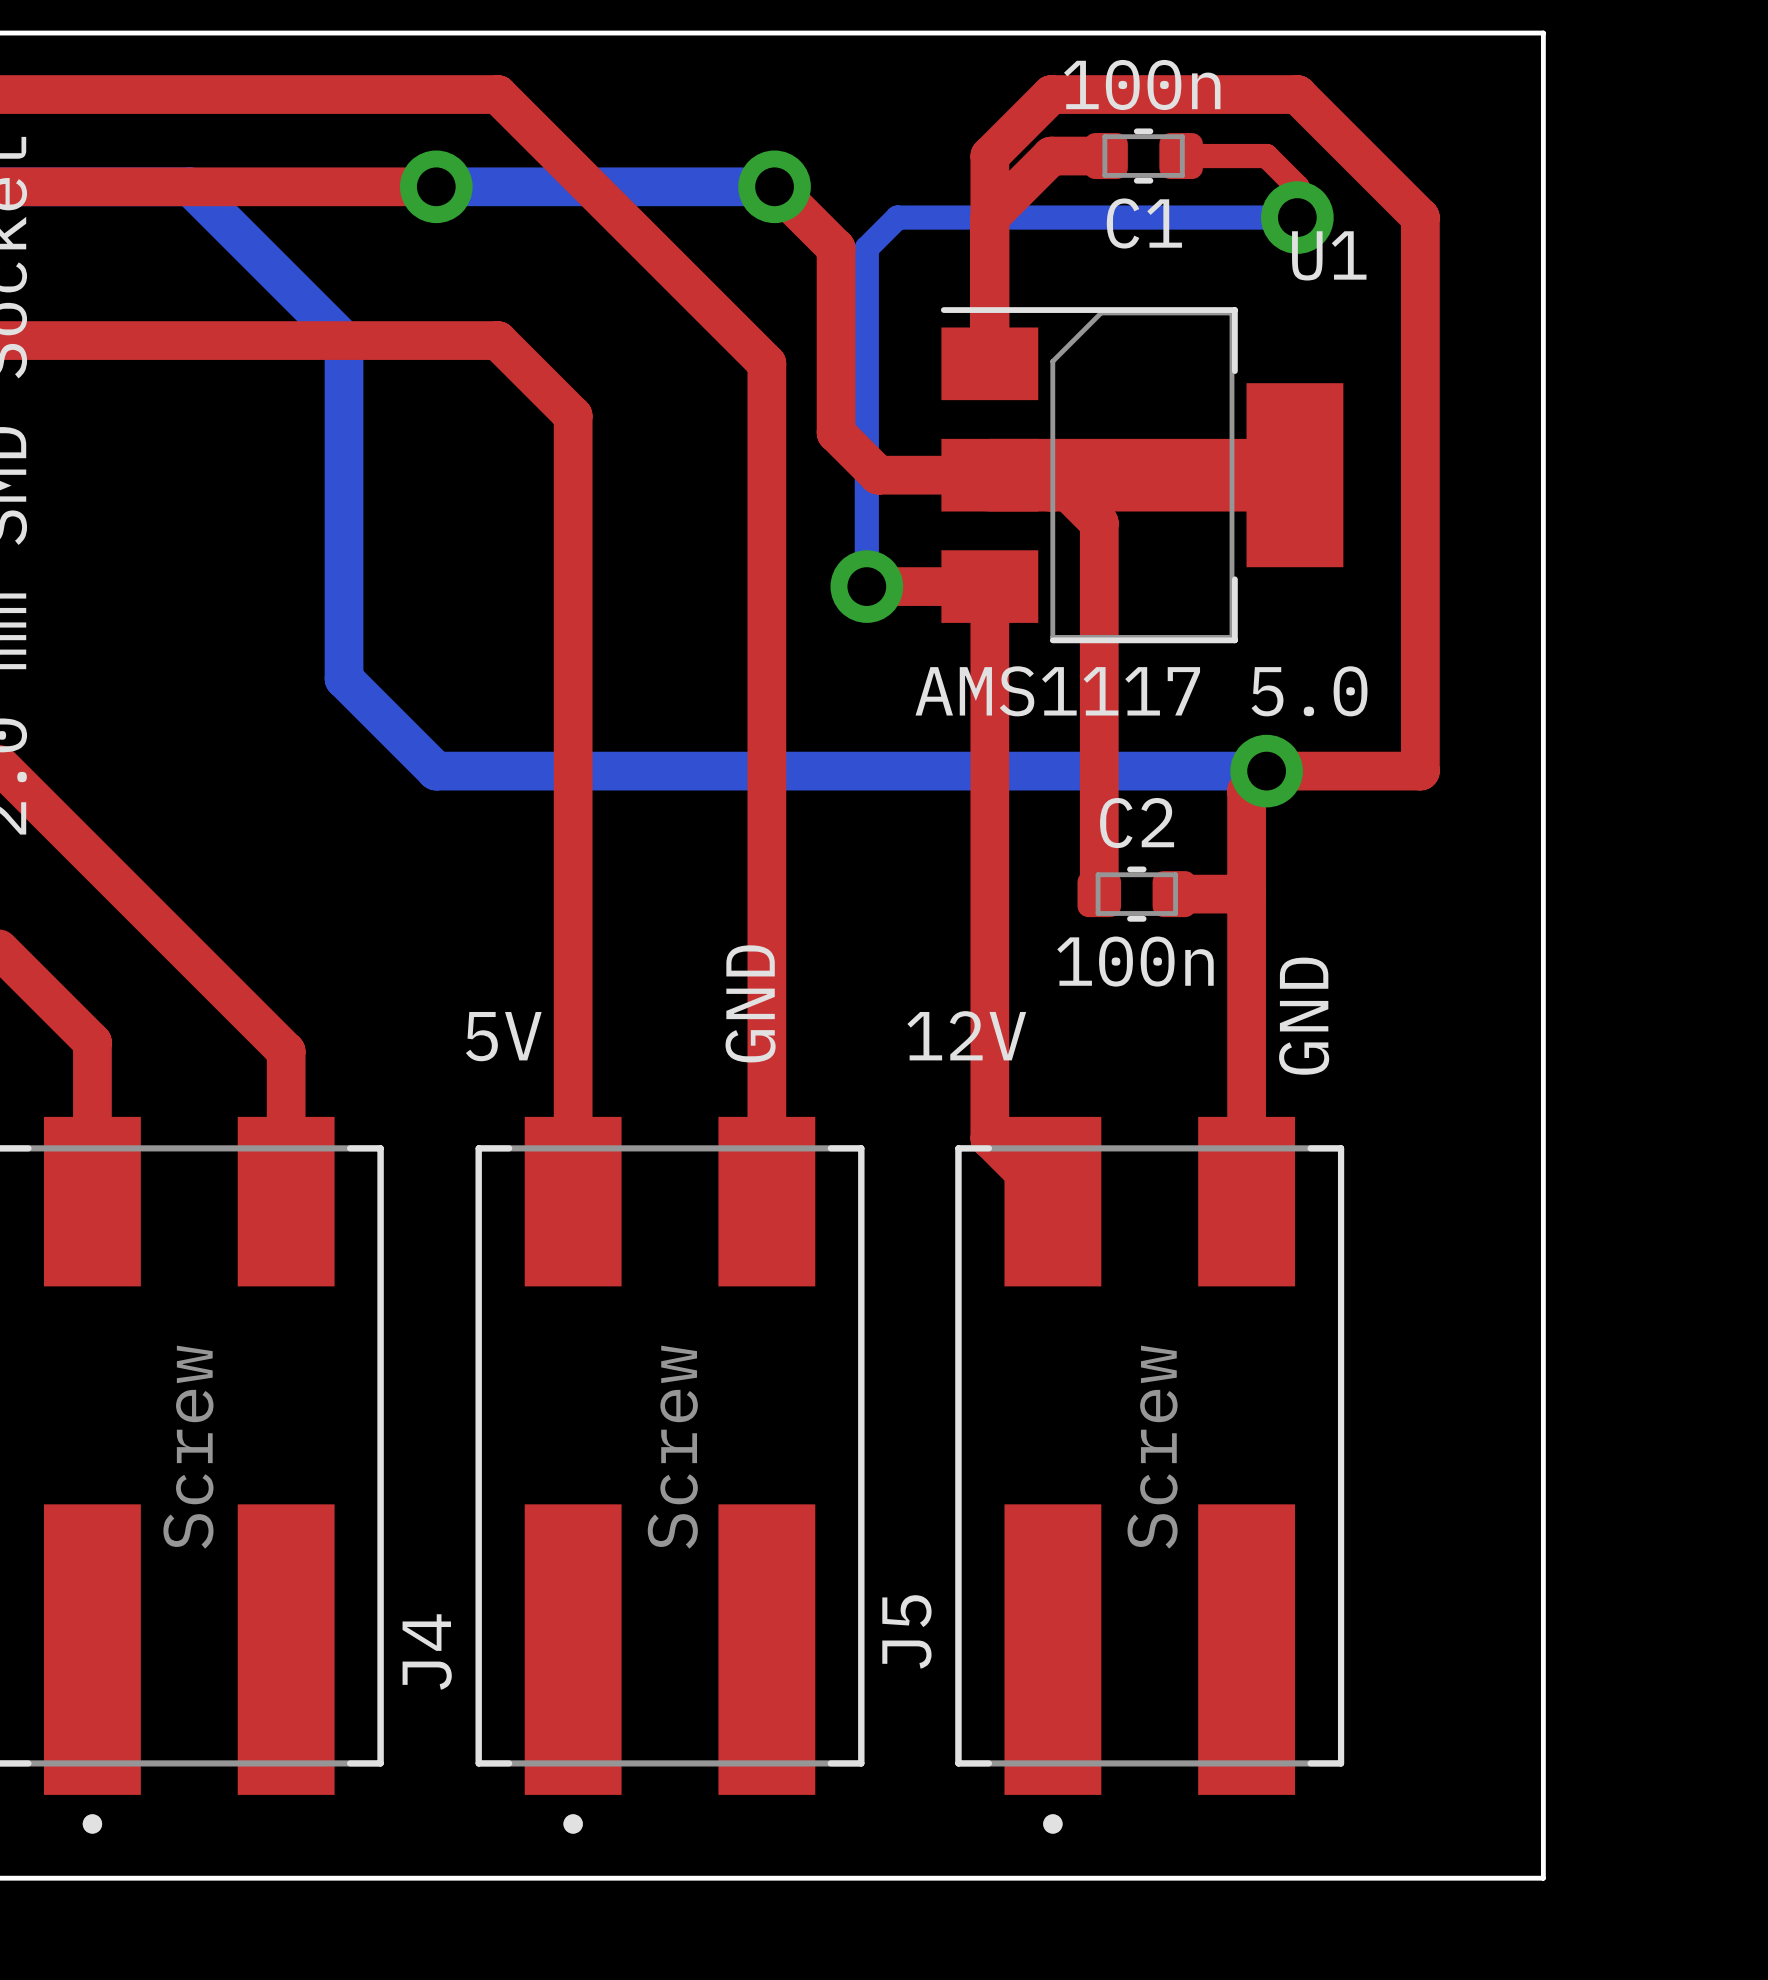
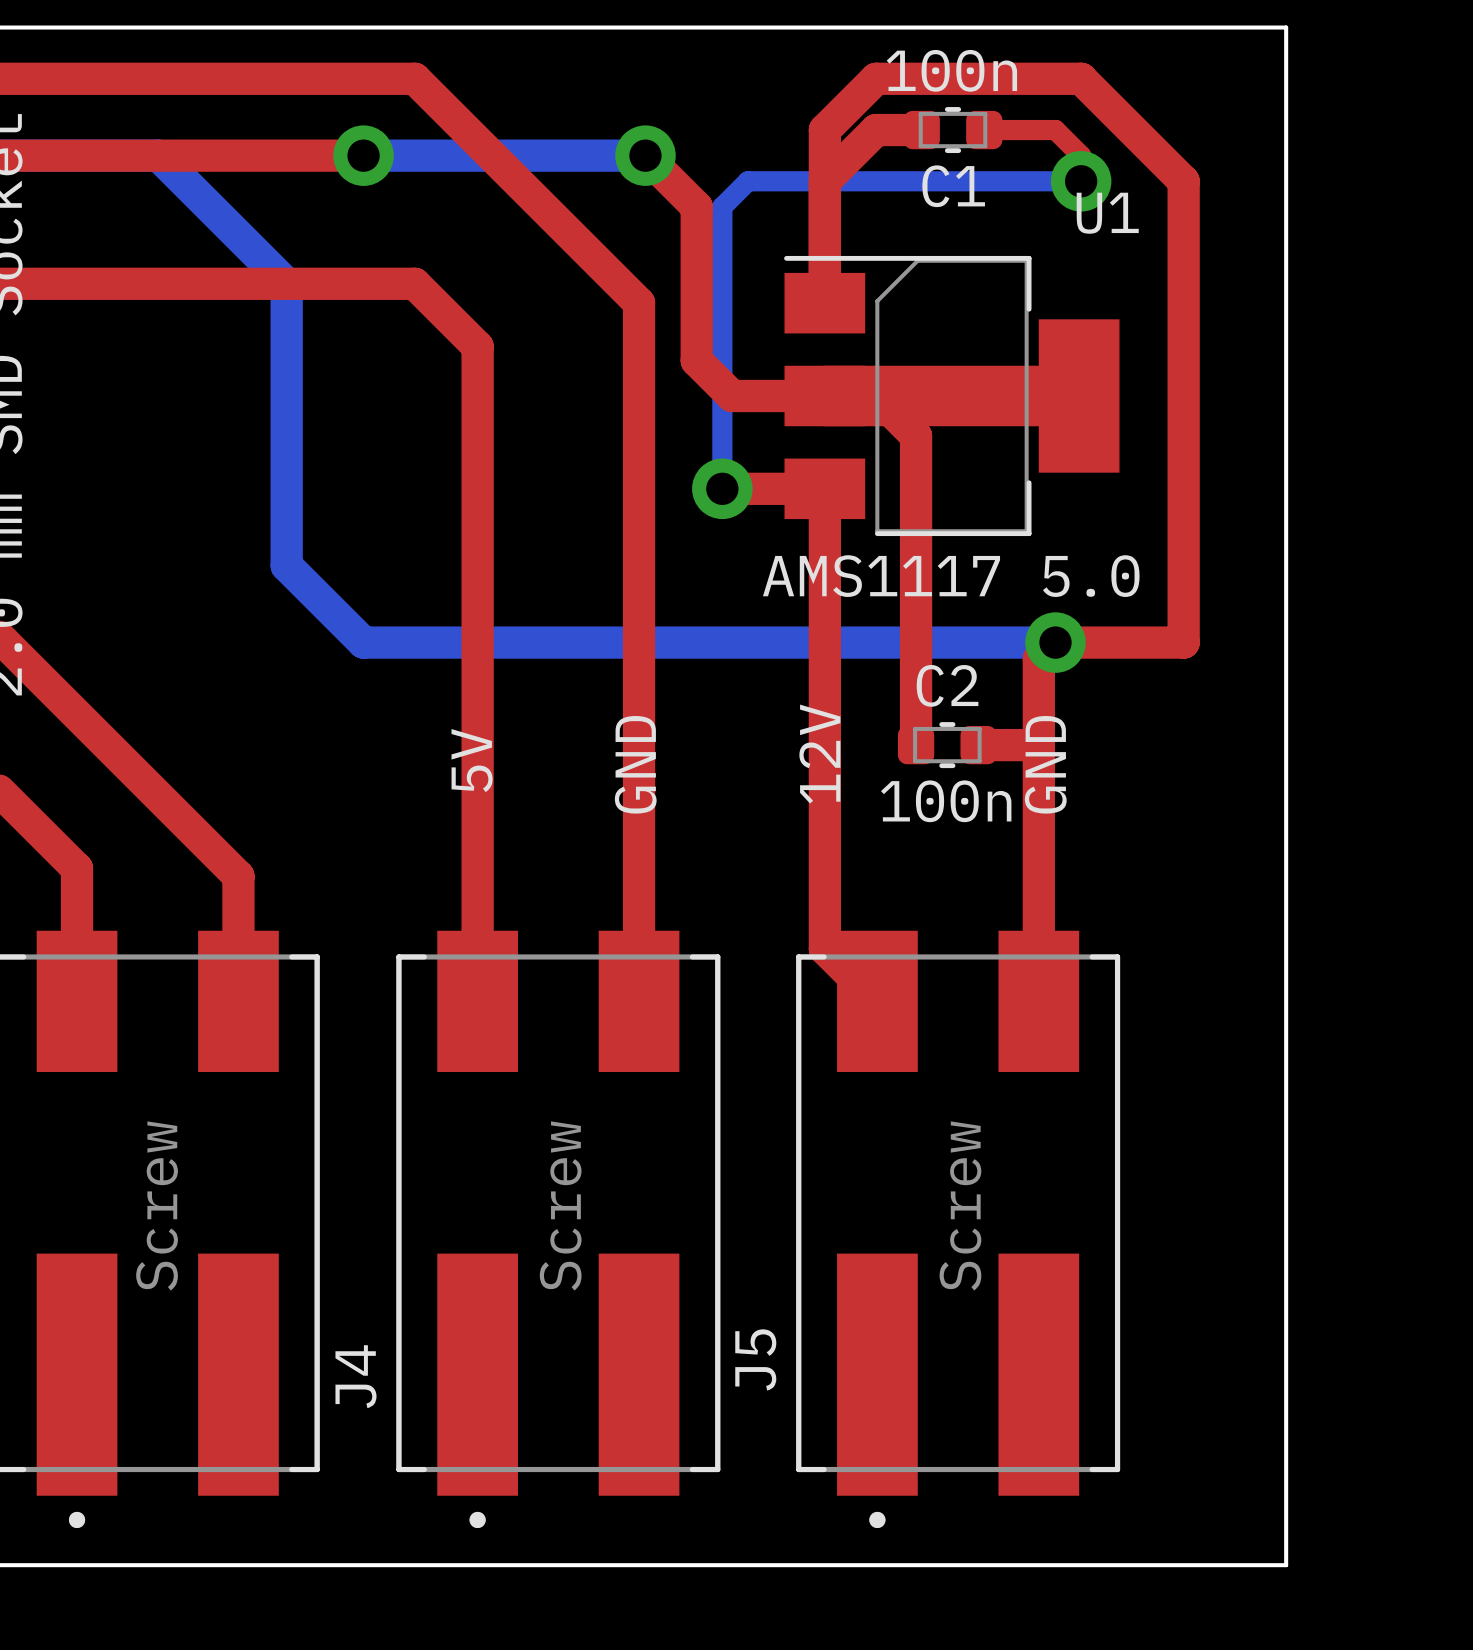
text position: GND (750, 1003) -> GND (635, 764)
text position: GND (1304, 1016) -> GND (1045, 764)
text rotation: 0° (966, 1035) -> 90° counterclockwise (819, 754)
text rotation: 0° (503, 1036) -> 90° counterclockwise (472, 760)
text position: 5V (503, 1036) -> 5V (472, 760)

